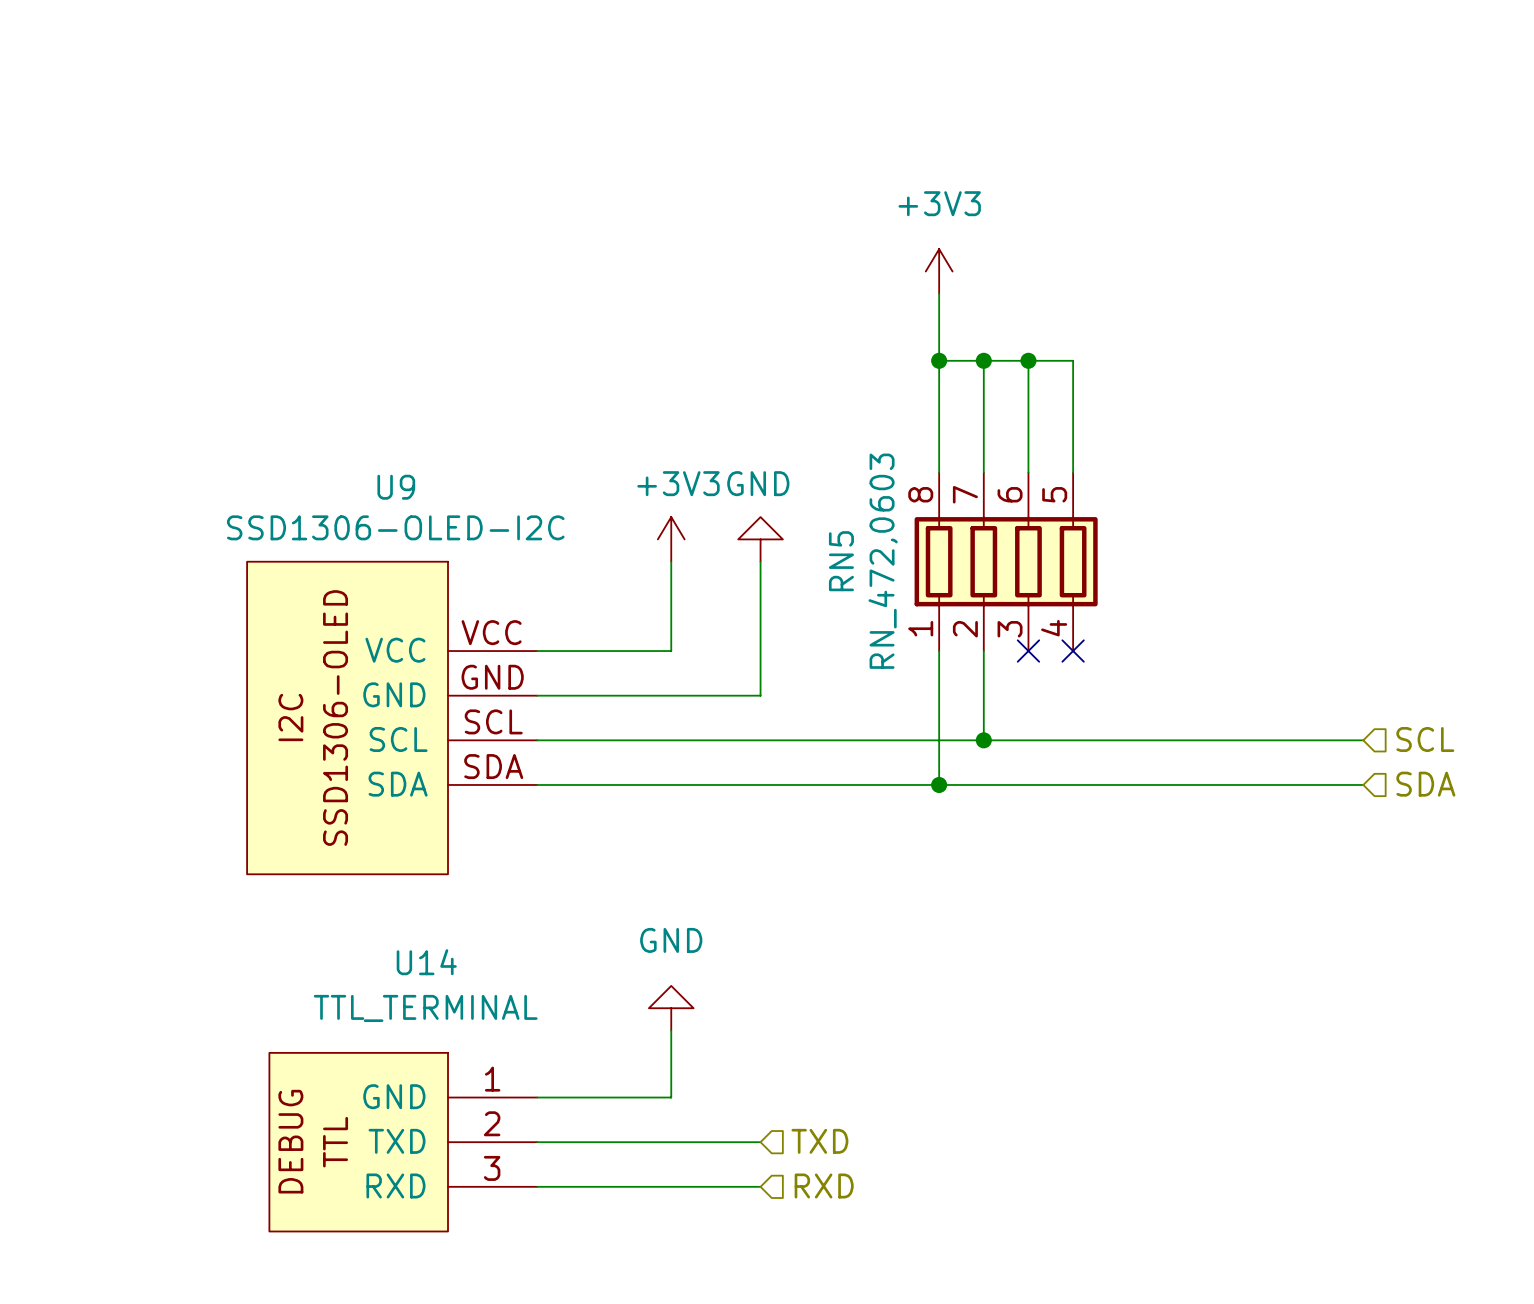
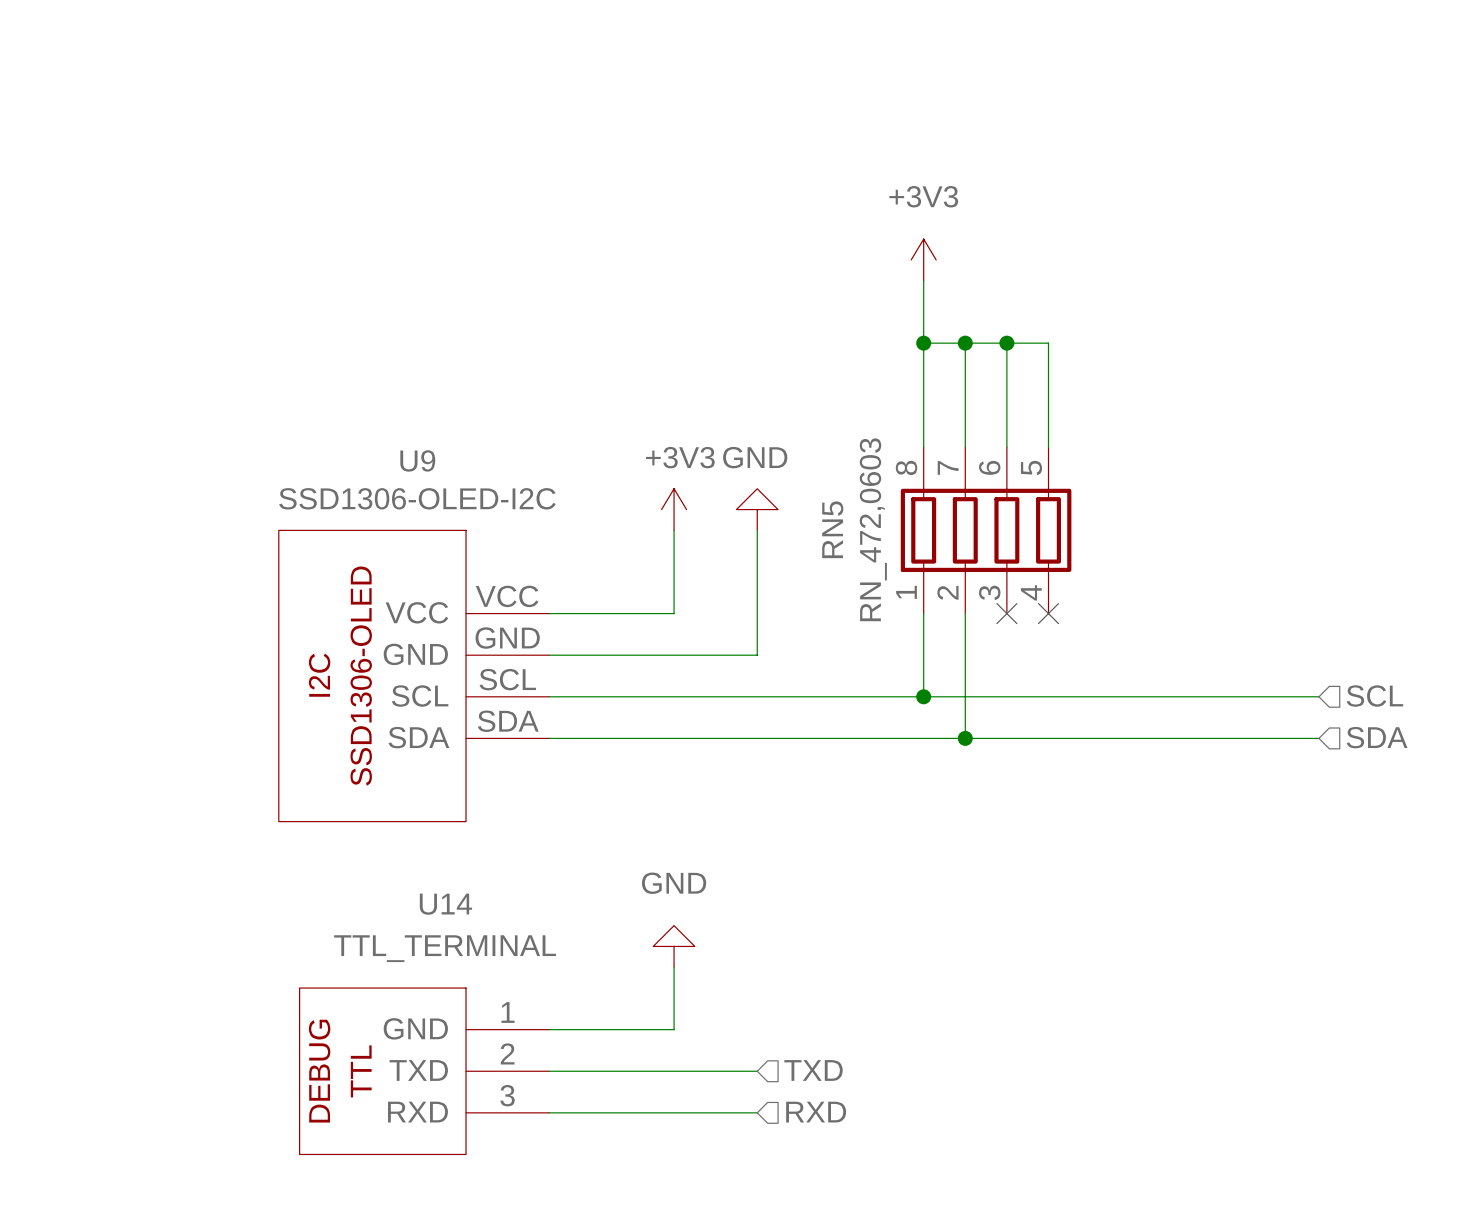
wire: (939, 740) (939, 784) -> (965, 696) (965, 738)
junction: none -> (923, 696)
junction: (983, 740) -> none
junction: (939, 784) -> none
junction: none -> (965, 738)

